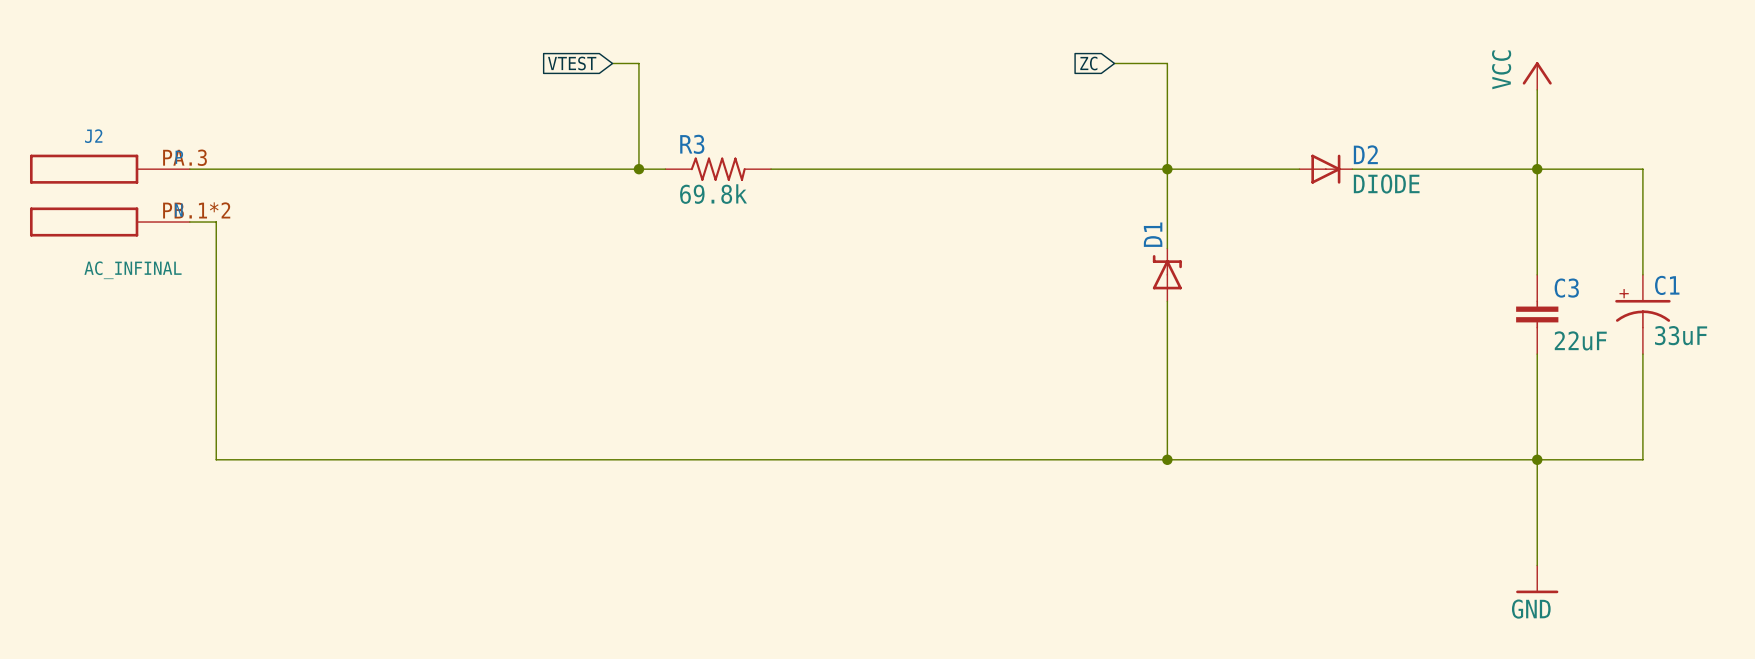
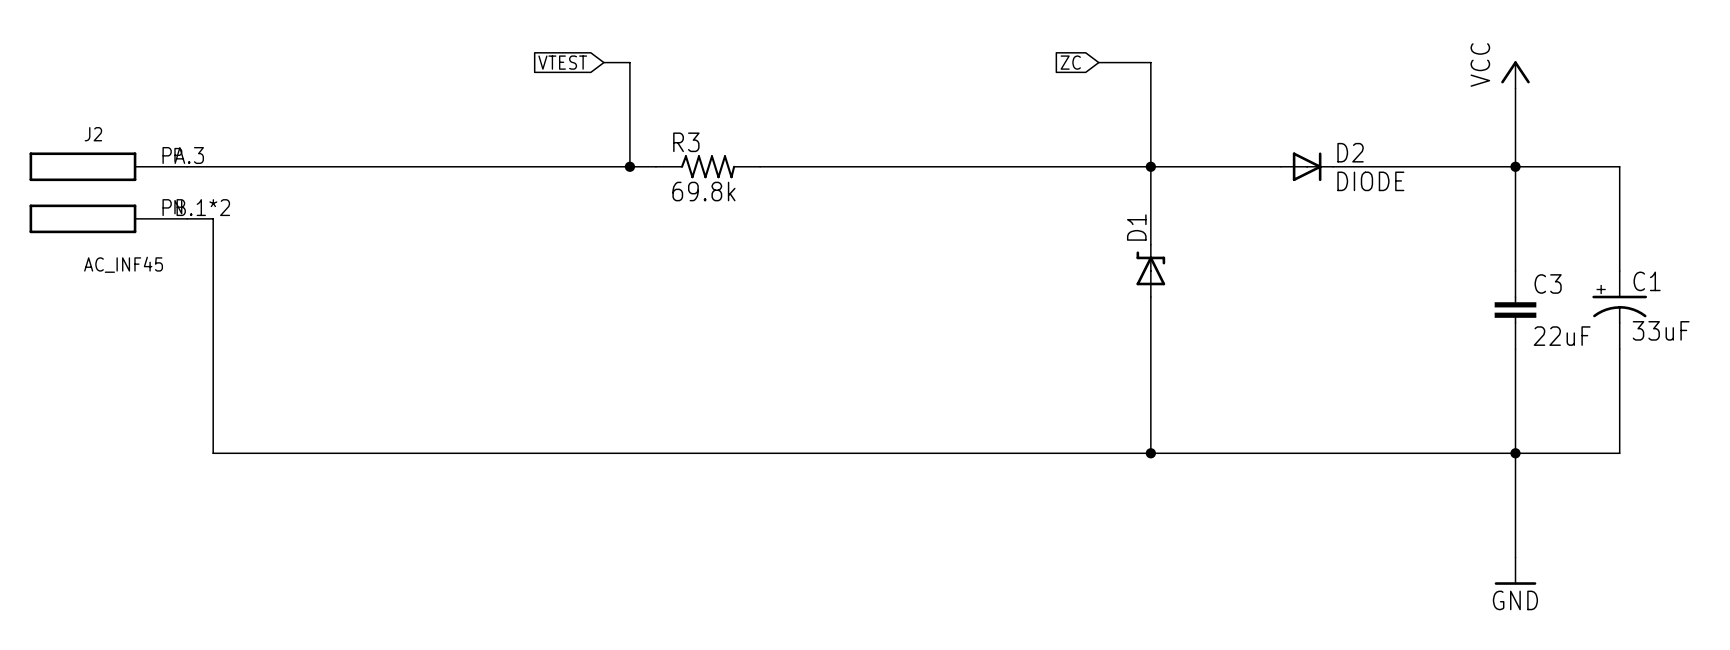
J2 value: AC_INFINAL (133, 270) -> AC_INF45 (123, 264)

